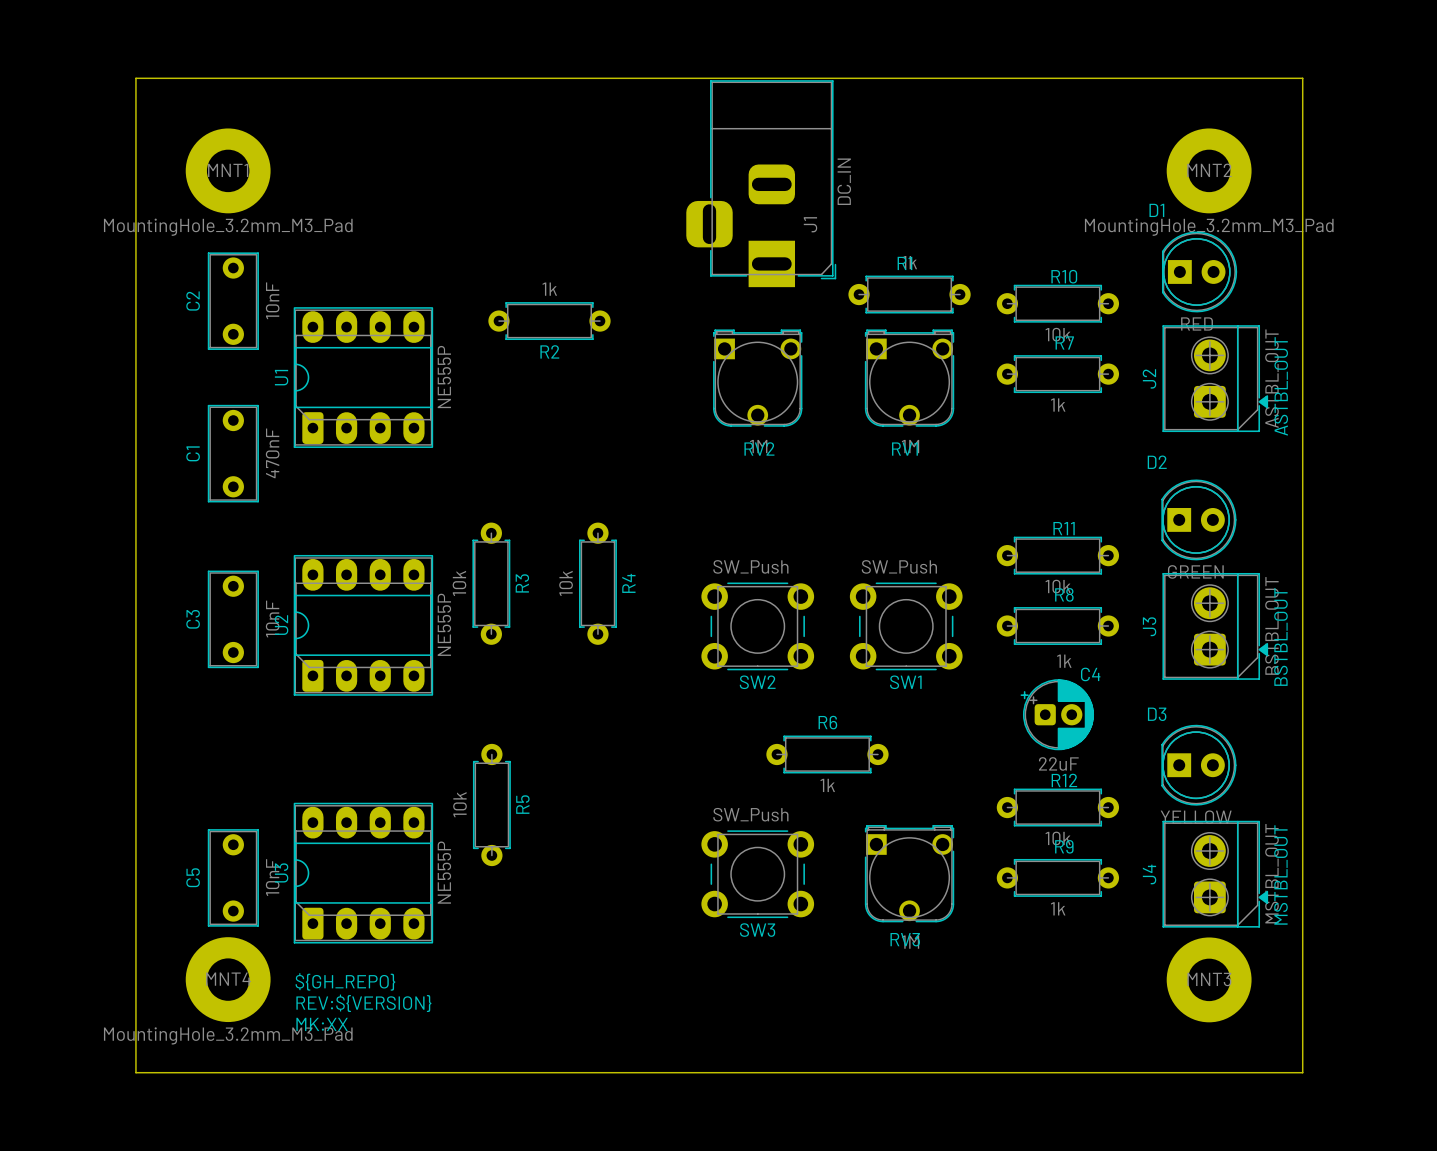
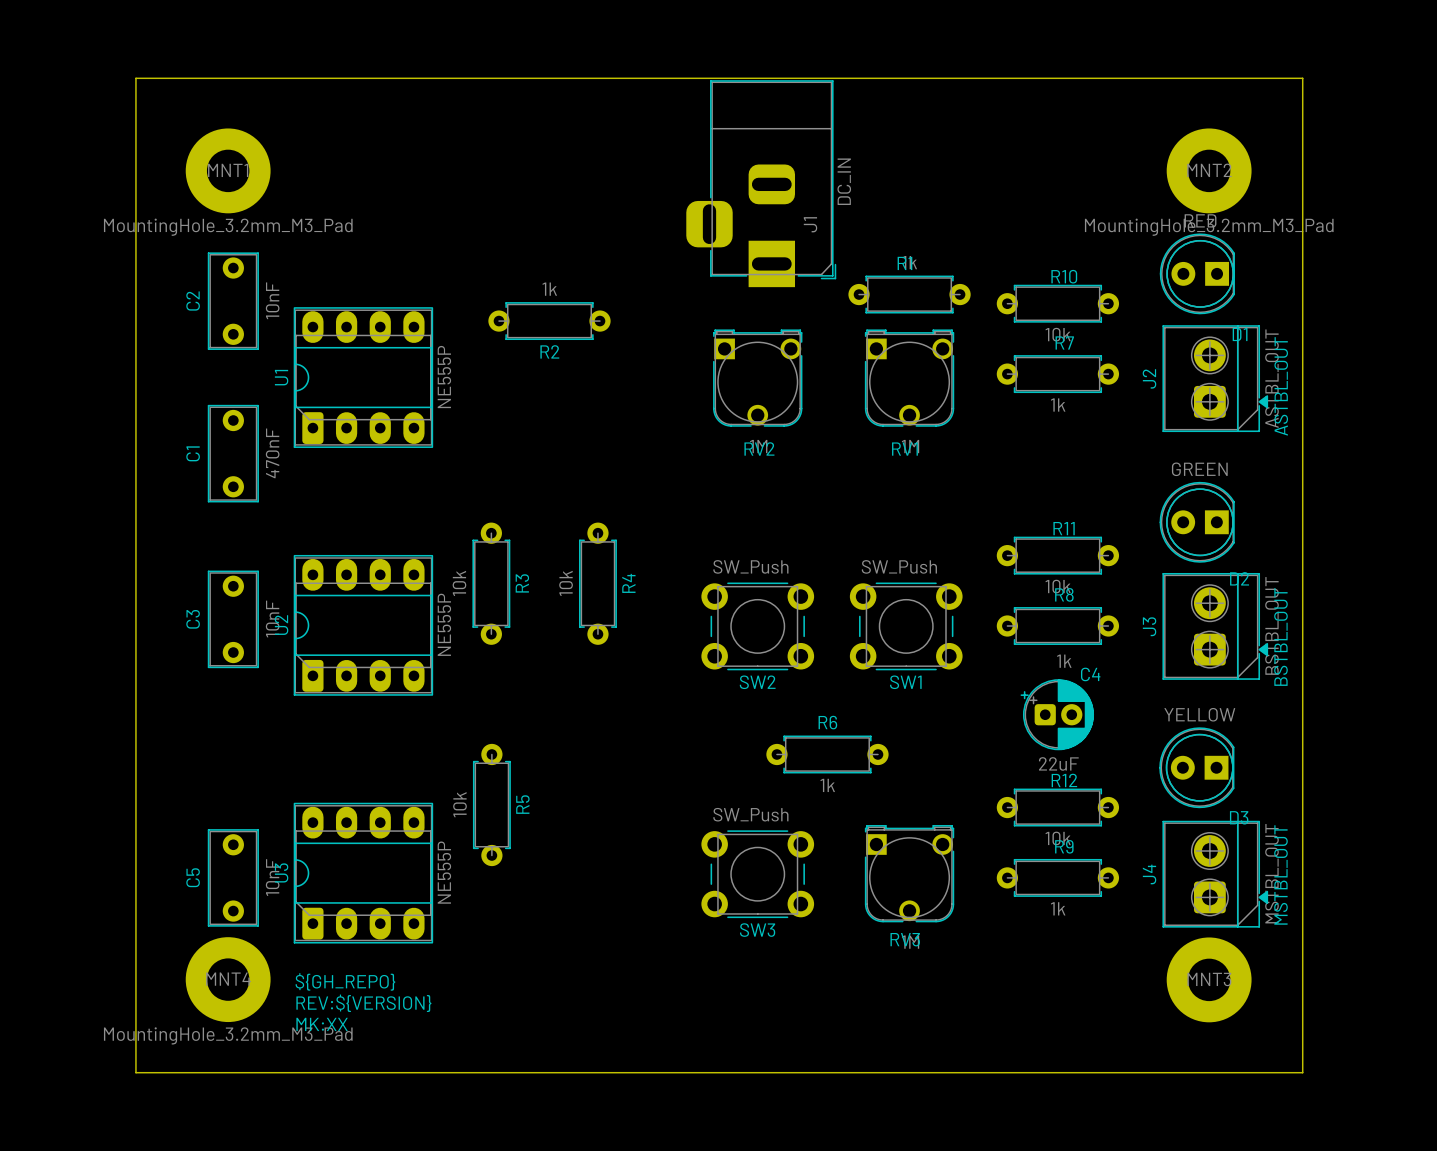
D1 rotation: 0° (1199, 271) -> 180° (1197, 273)
D2 rotation: 0° (1198, 519) -> 180° (1197, 522)
D3 rotation: 0° (1198, 765) -> 180° (1196, 767)

